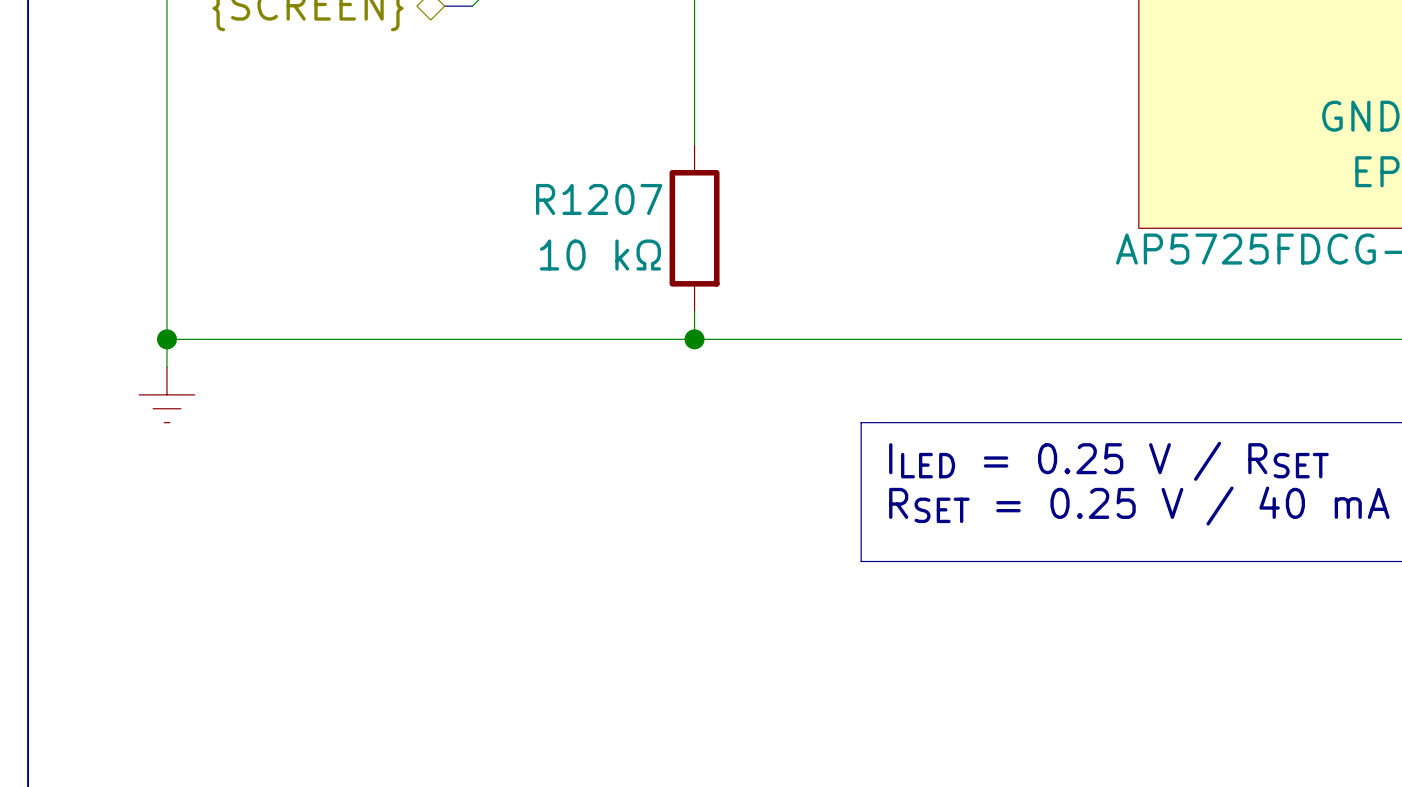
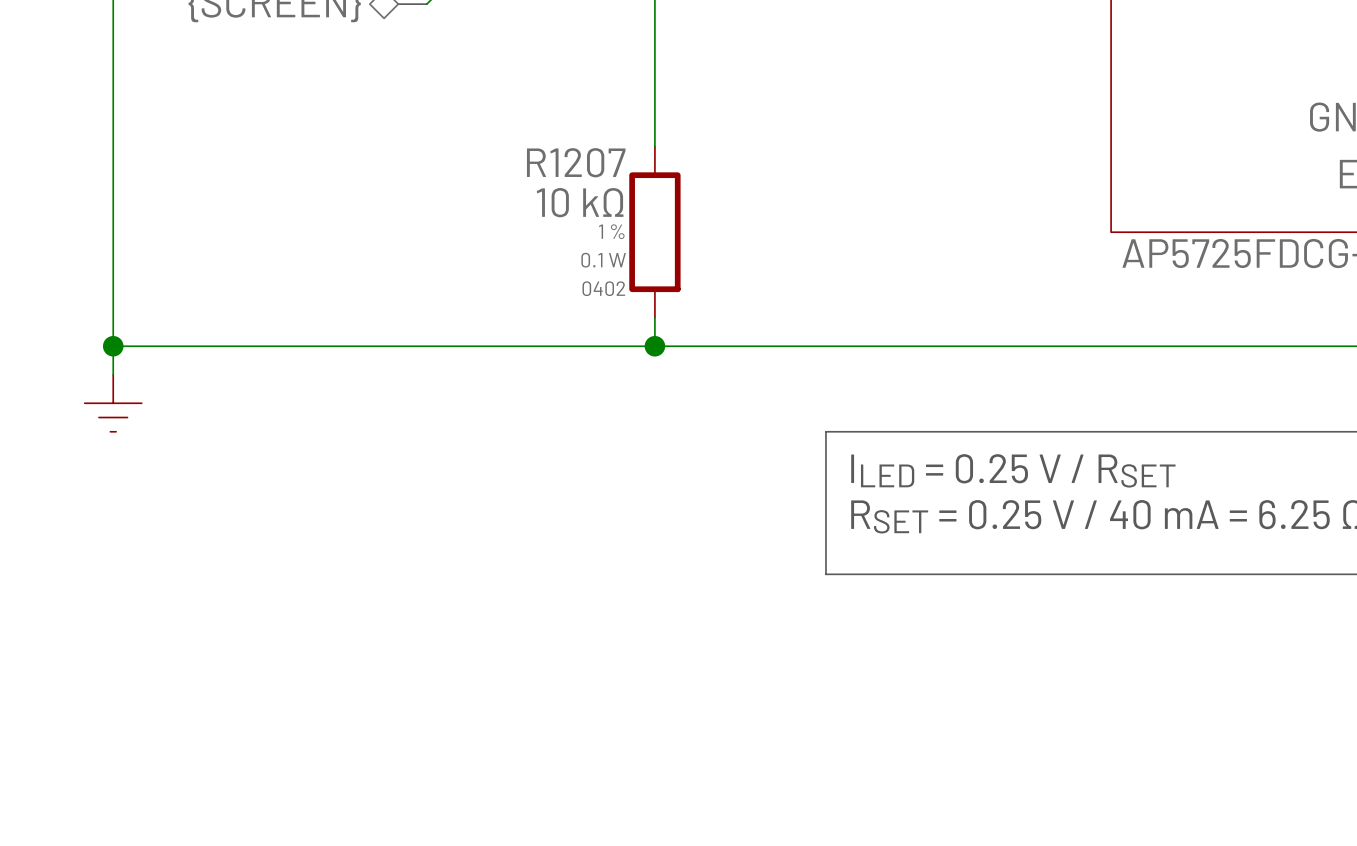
R1207 name position: R1207 (599, 199) -> R1207 (576, 162)
R1207 text: none -> 1 % (611, 231)
R1207 value position: 10 kΩ (600, 255) -> 10 kΩ (580, 202)
R1207 text: none -> 0.1 W (603, 260)
R1207 text: none -> 0402 (603, 288)

